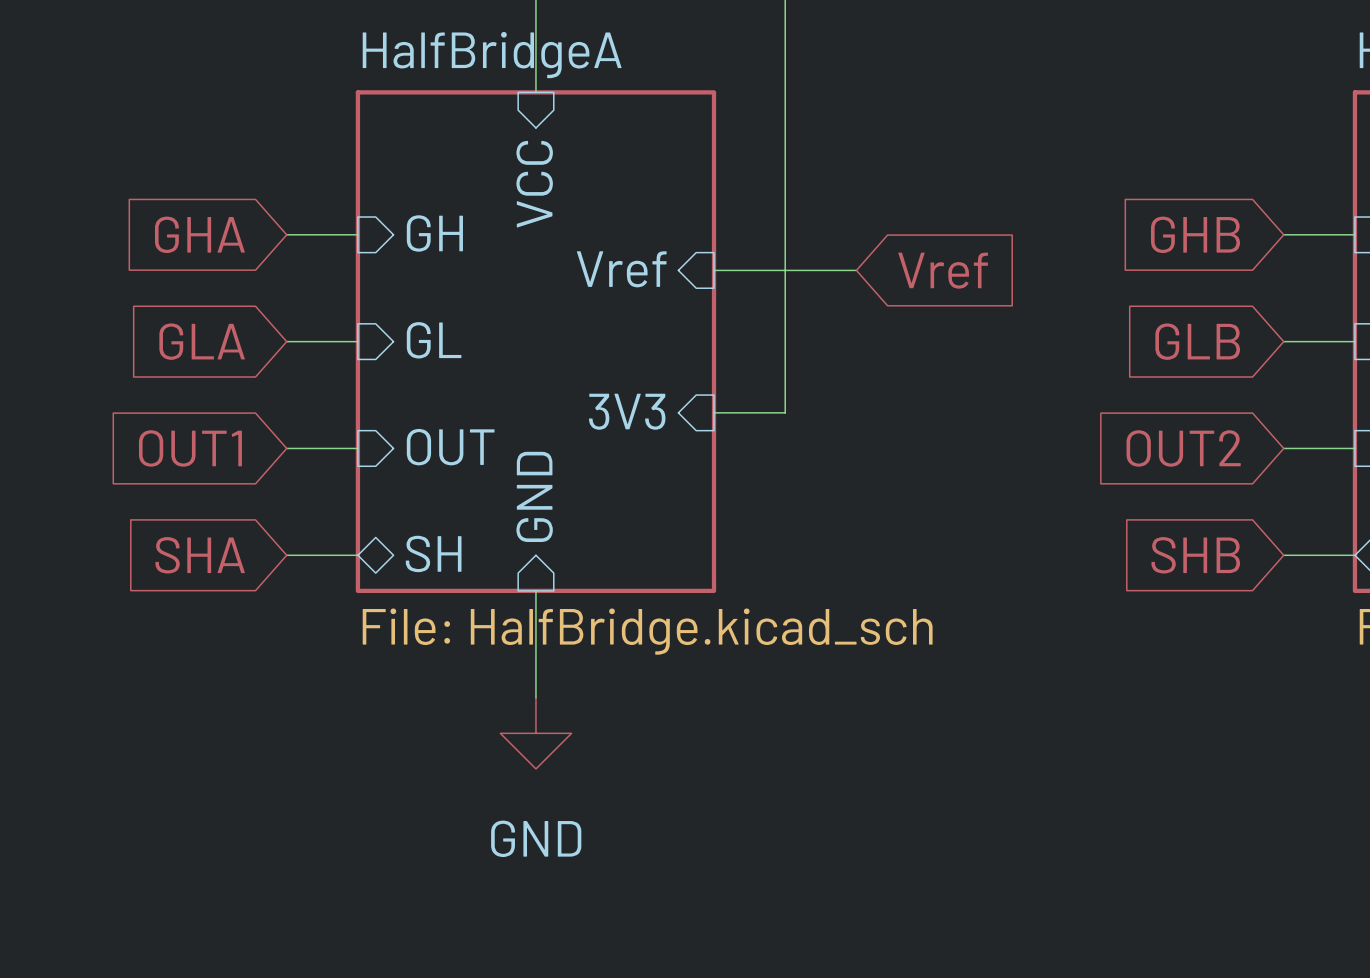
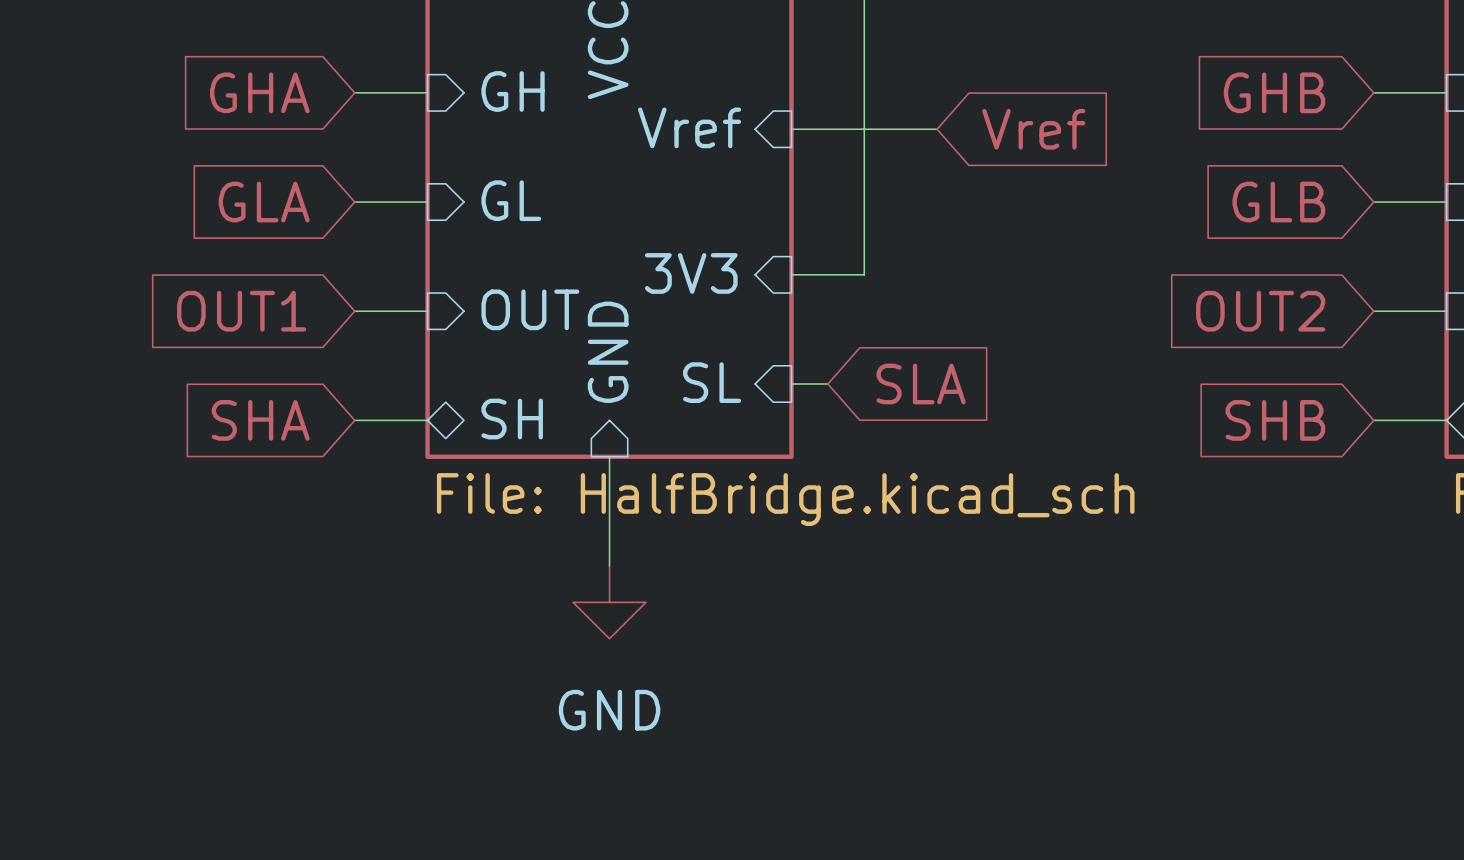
sheet pin: none -> SL (712, 382)
wire: none -> (791, 384) (827, 384)
global label: none -> SLA (921, 384)

